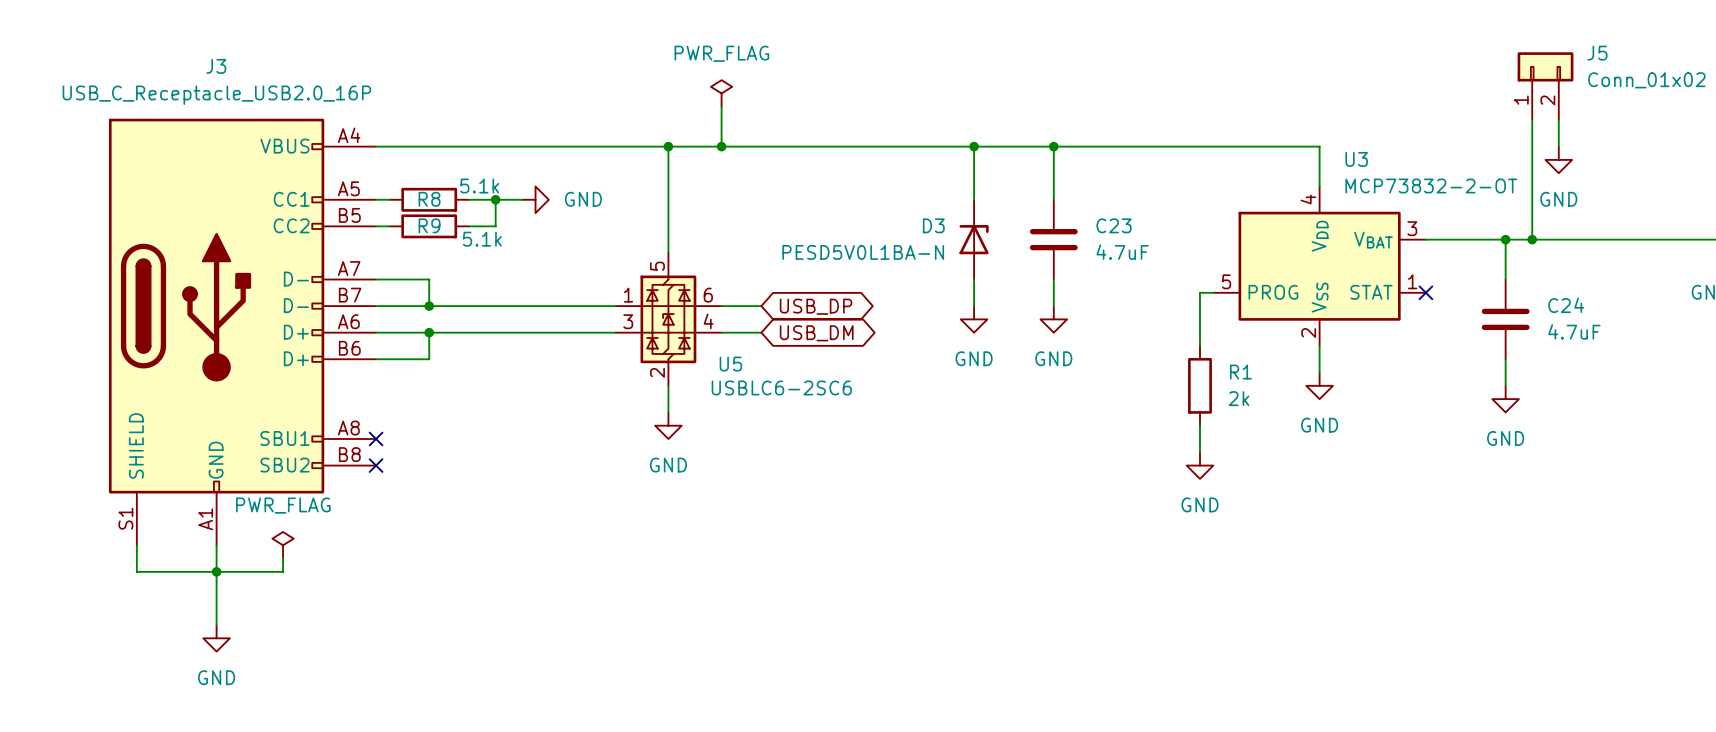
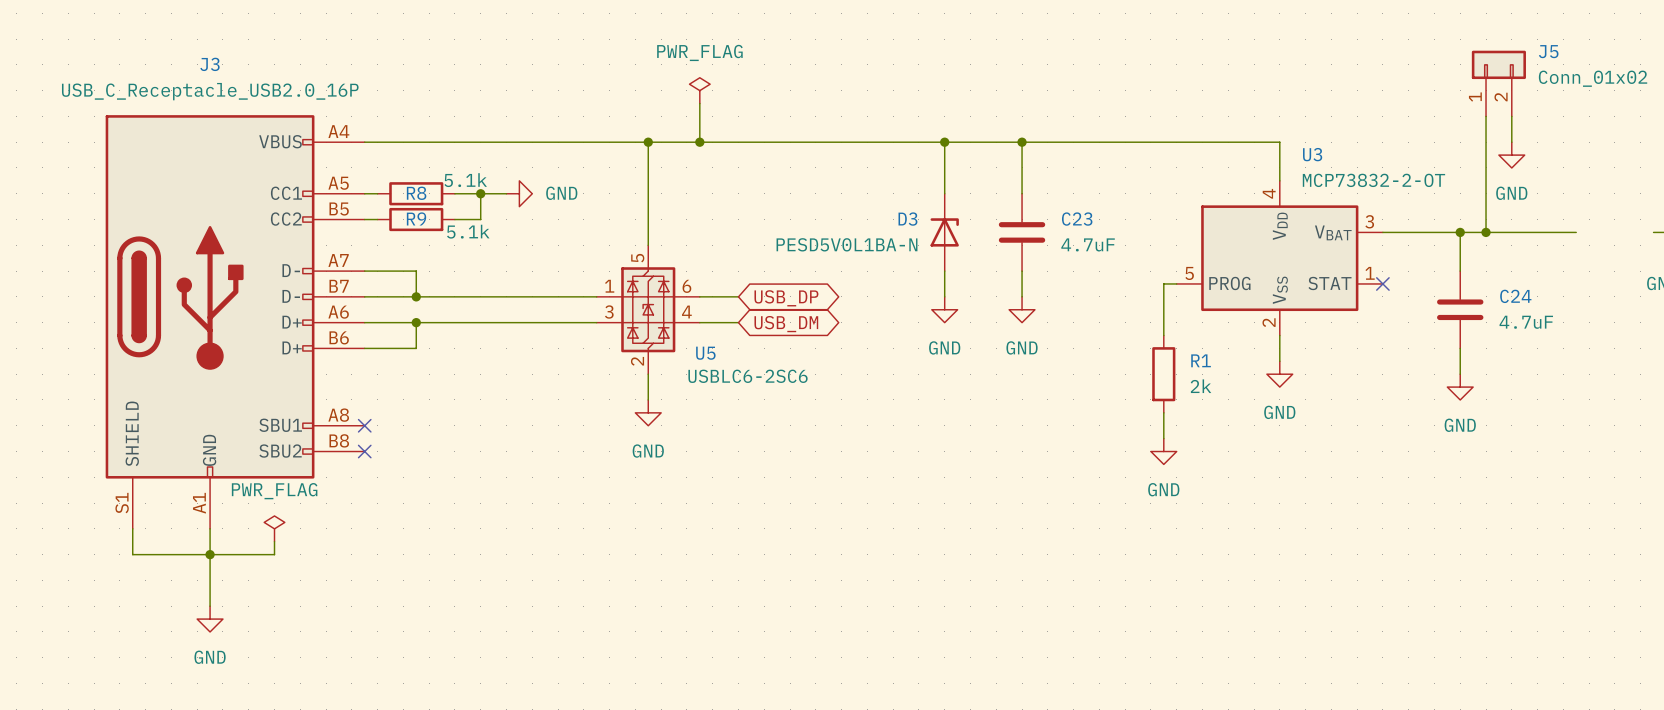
wire: (1625, 239) (1704, 239) -> none

